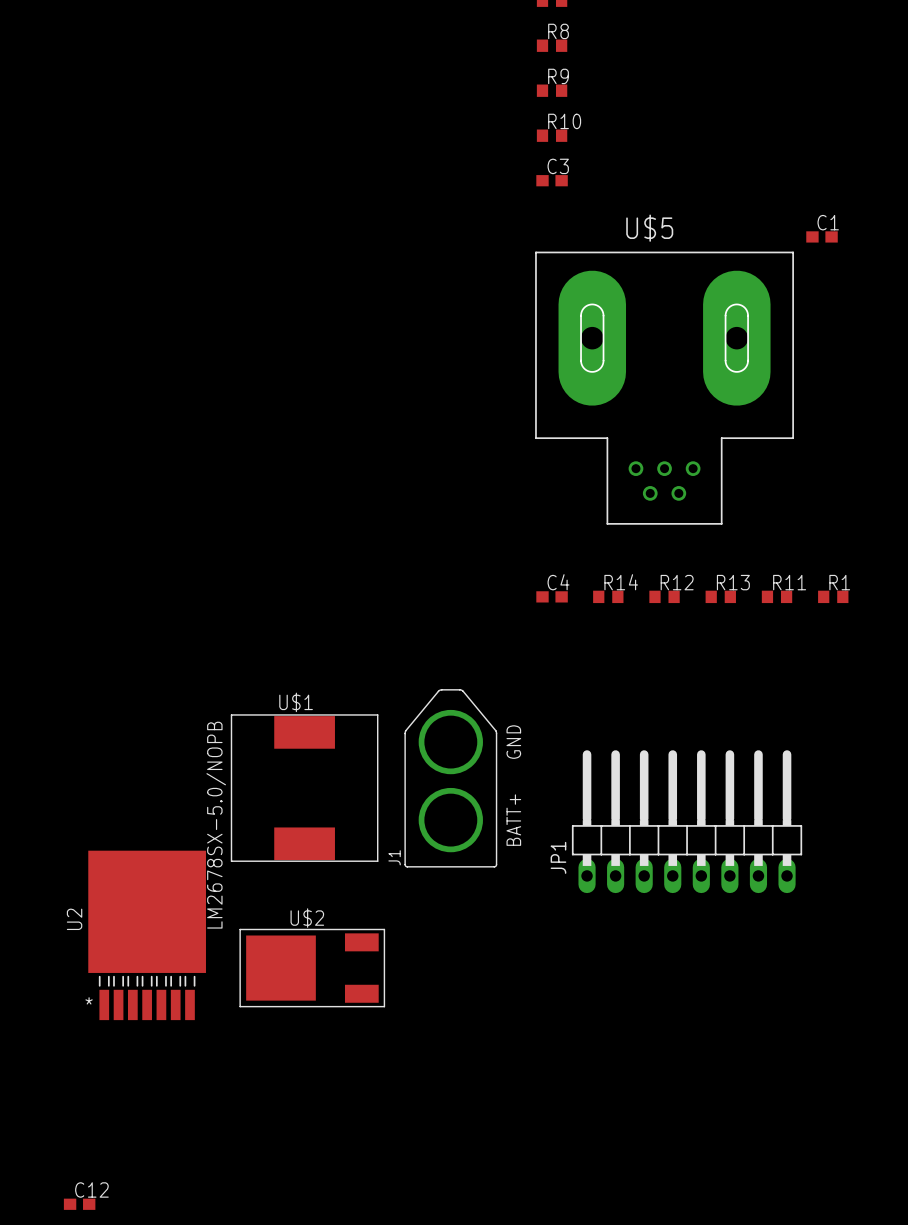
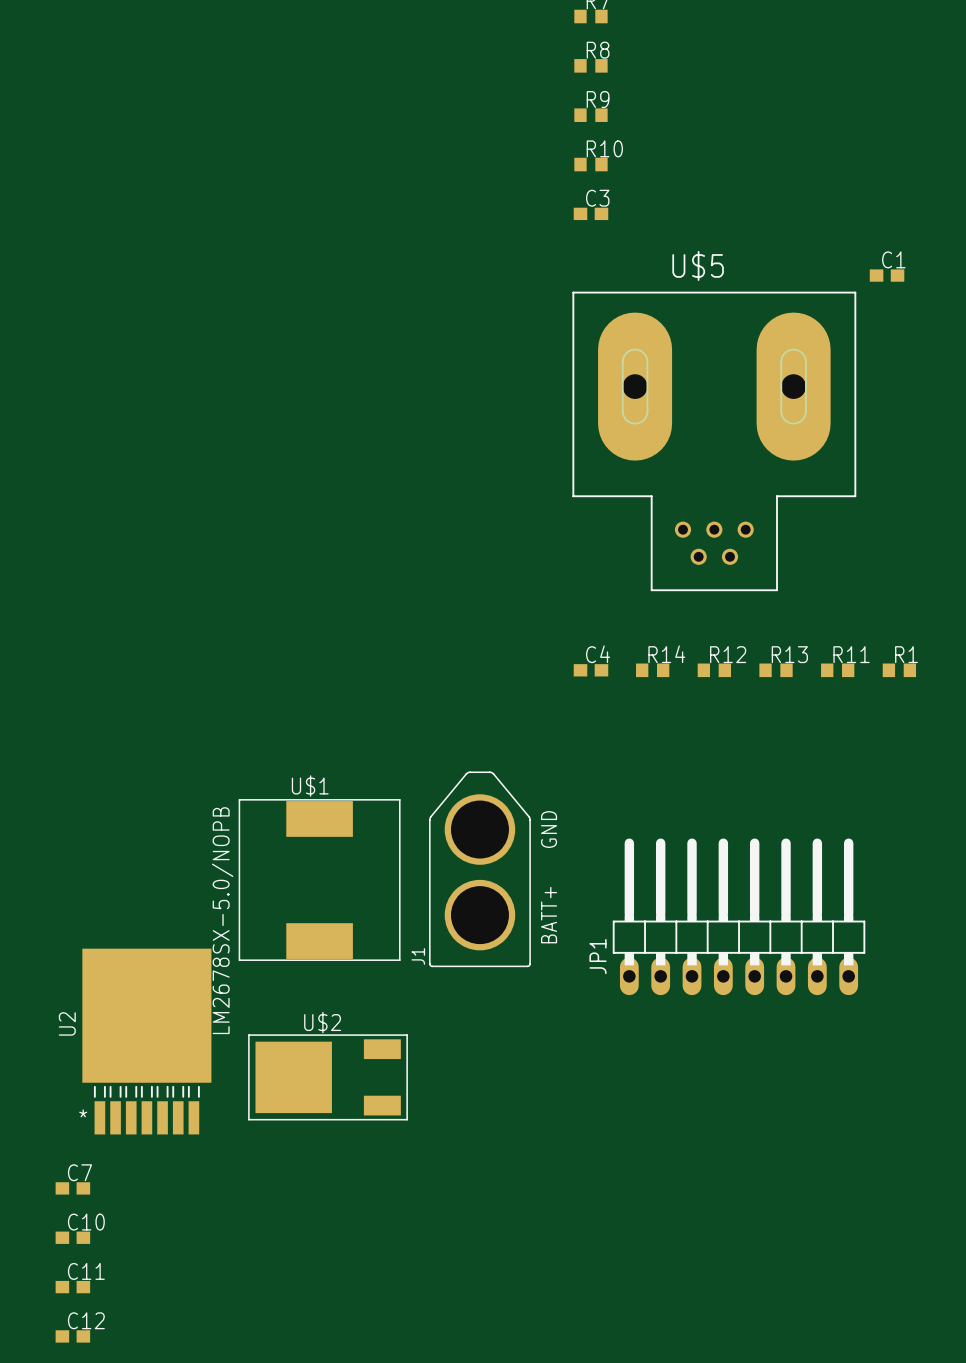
C7: none -> (72, 1188)
C10: none -> (72, 1237)
C11: none -> (72, 1287)

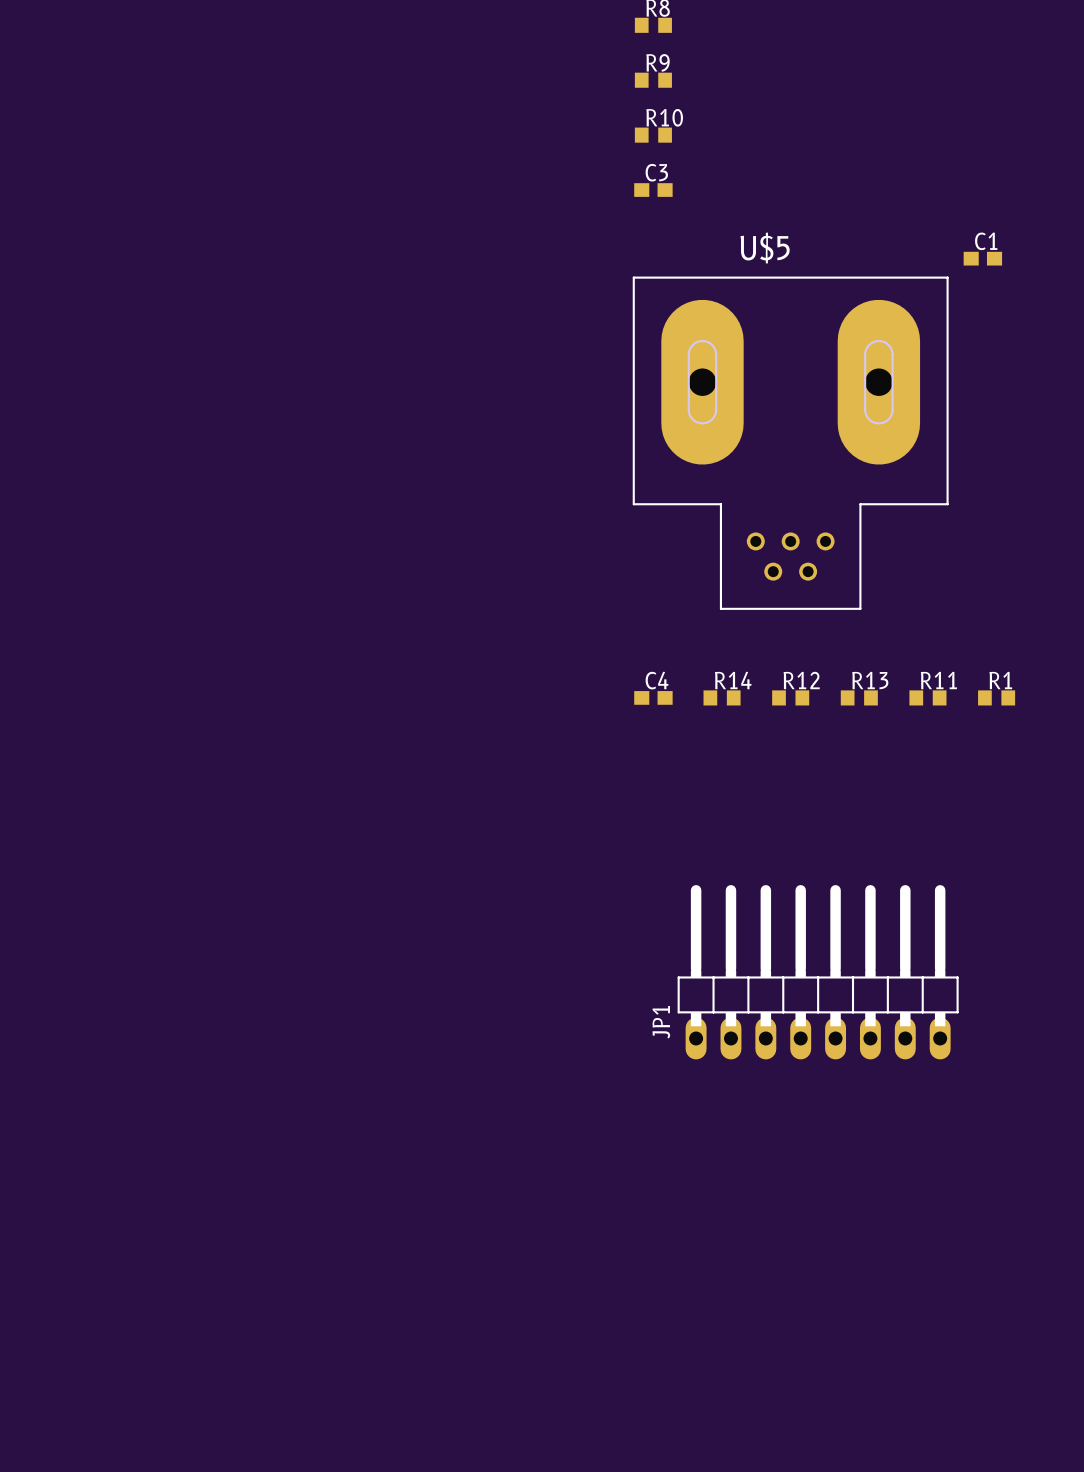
J1: (479, 869) -> none
U$1: (319, 880) -> none
U2: LM2678SX-5.0/NOPB (146, 1041) -> none
U$2: (328, 1077) -> none
C7: (72, 1188) -> none
C10: (72, 1237) -> none
C11: (72, 1287) -> none
C12: (72, 1336) -> none

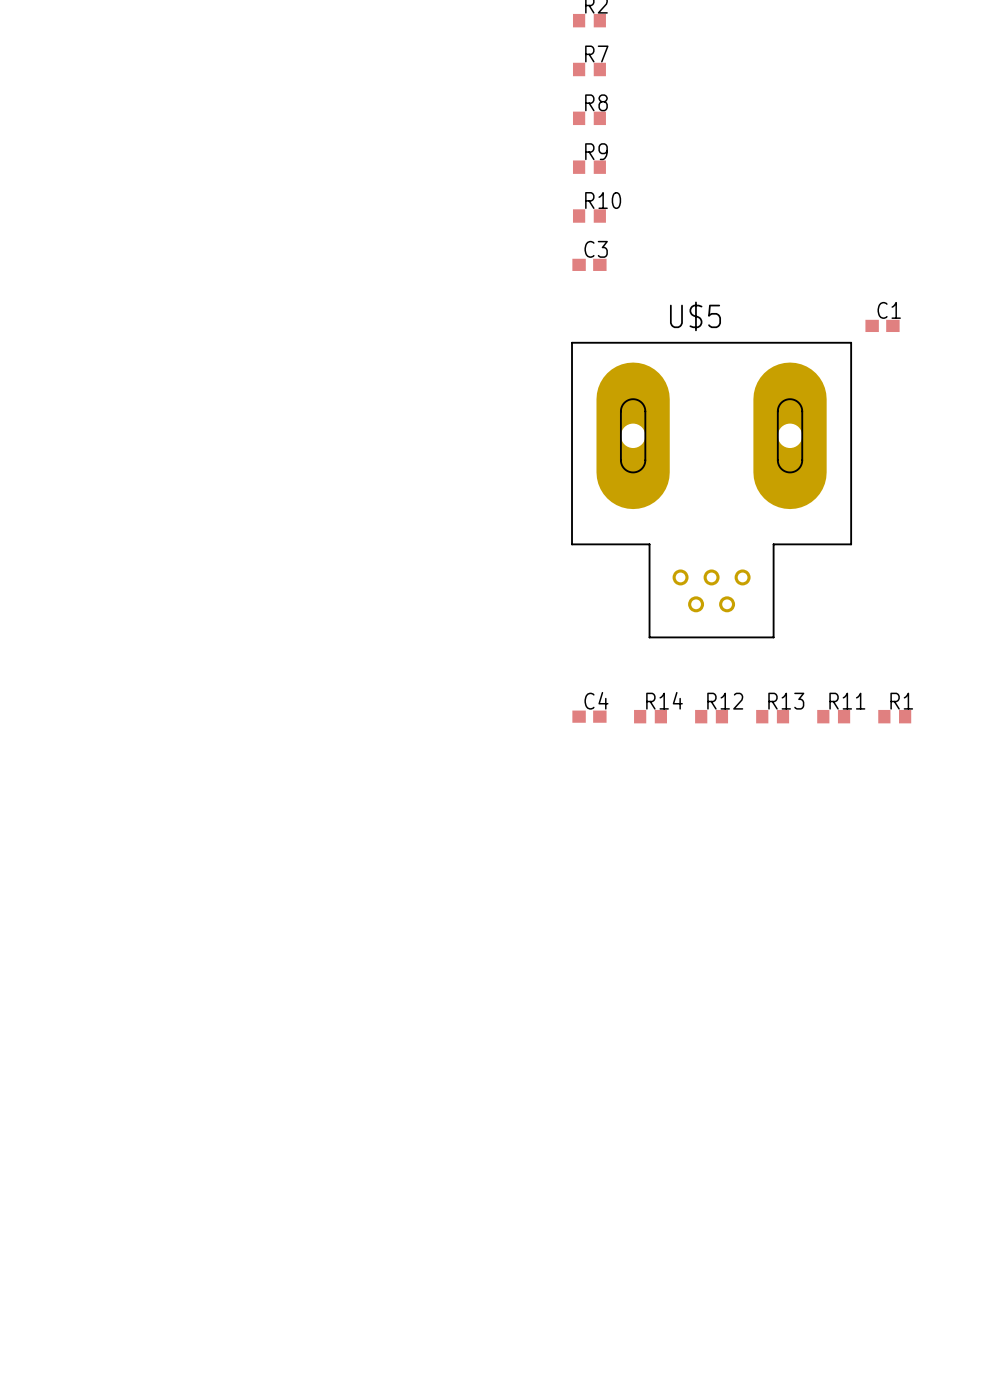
JP1: (818, 972) -> none

